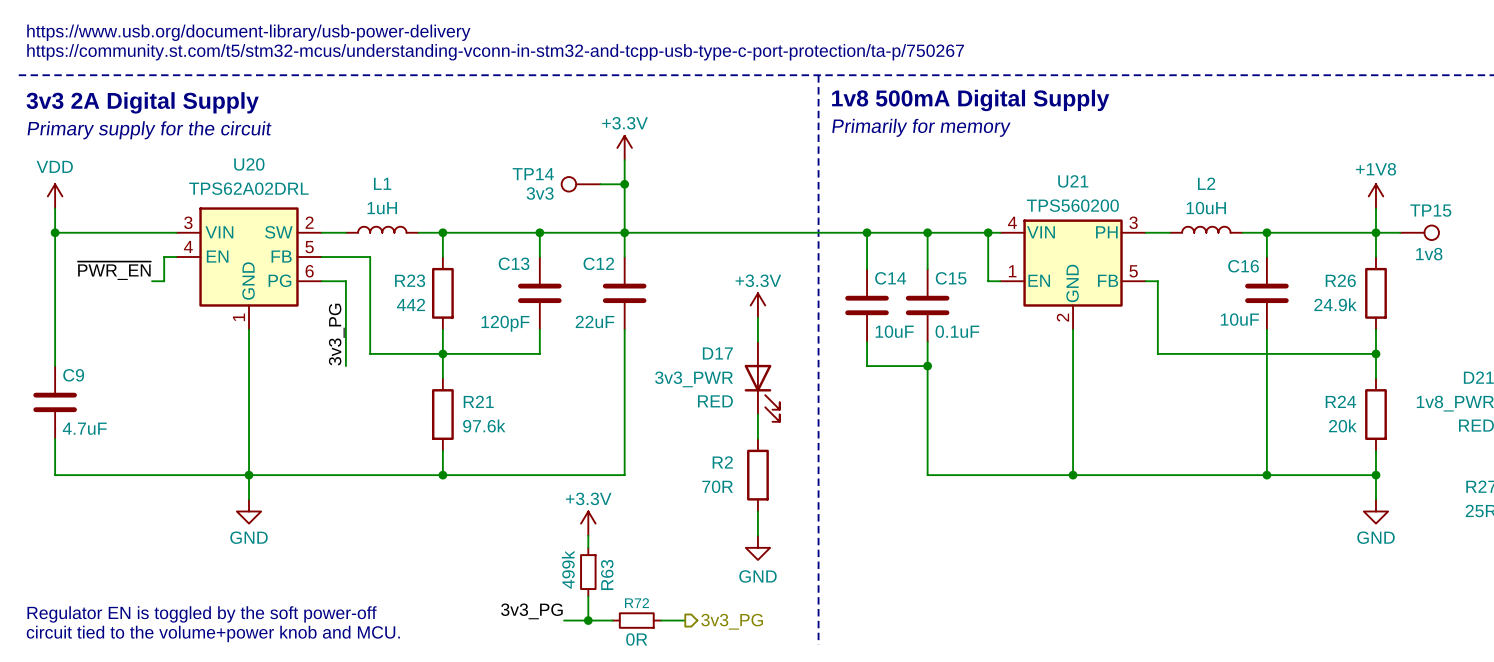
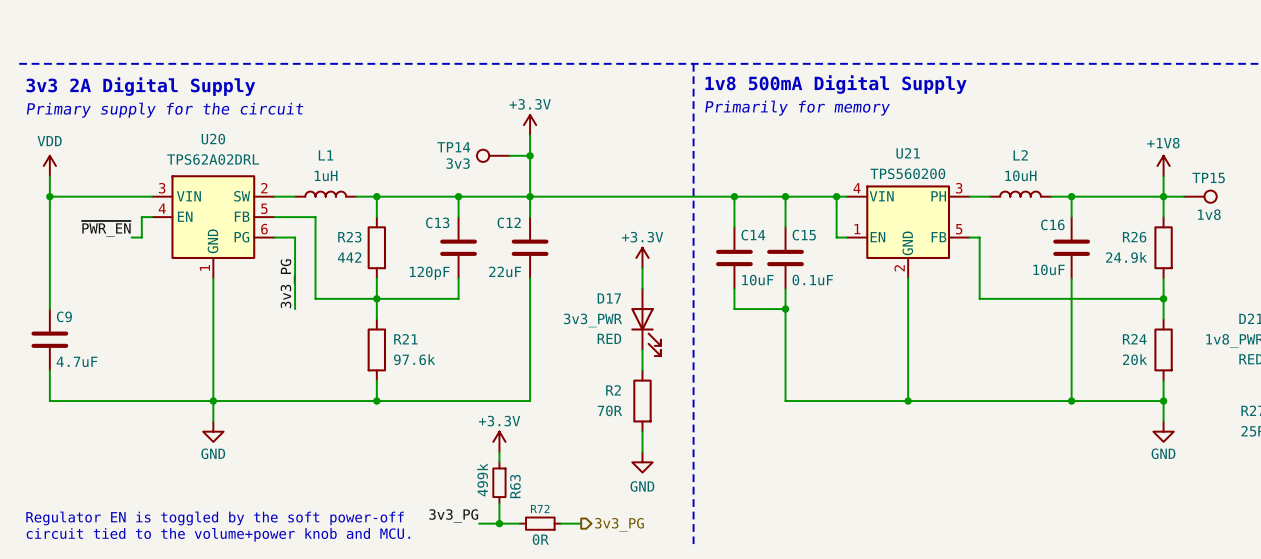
text: https://www.usb.org/document-library/usb-power-delivery (248, 32) -> none
text: https://community.st.com/t5/stm32-mcus/understanding-vconn-in-stm32-and-tcpp-usb-type-c-port-protection/ta-p/750267 (495, 52) -> none

